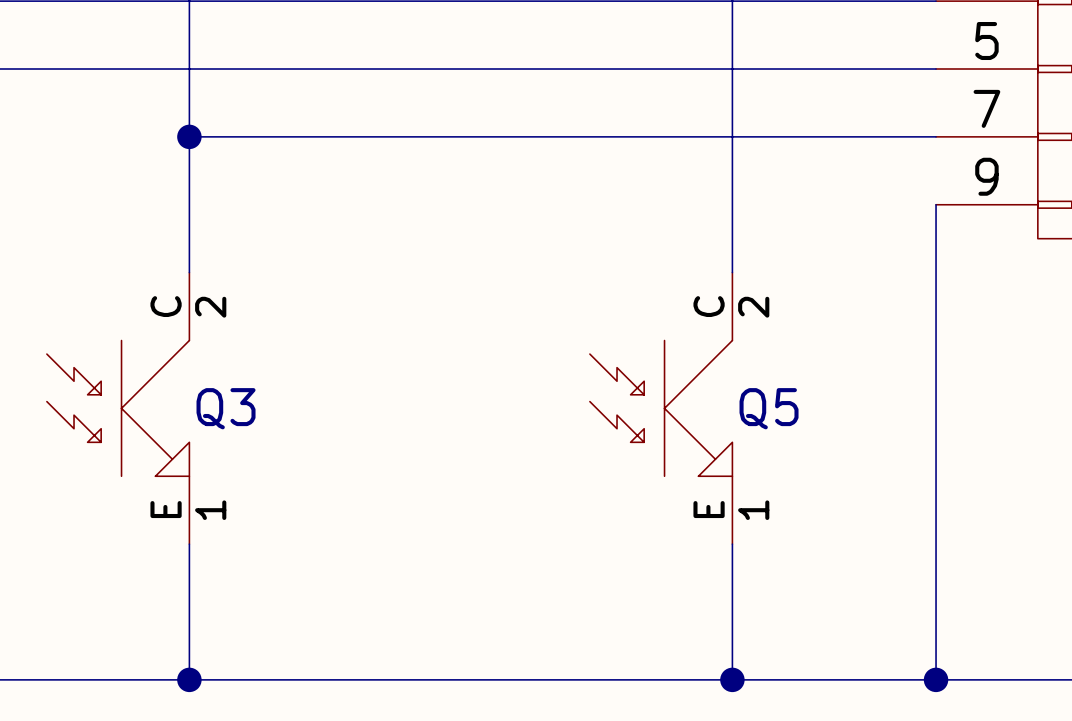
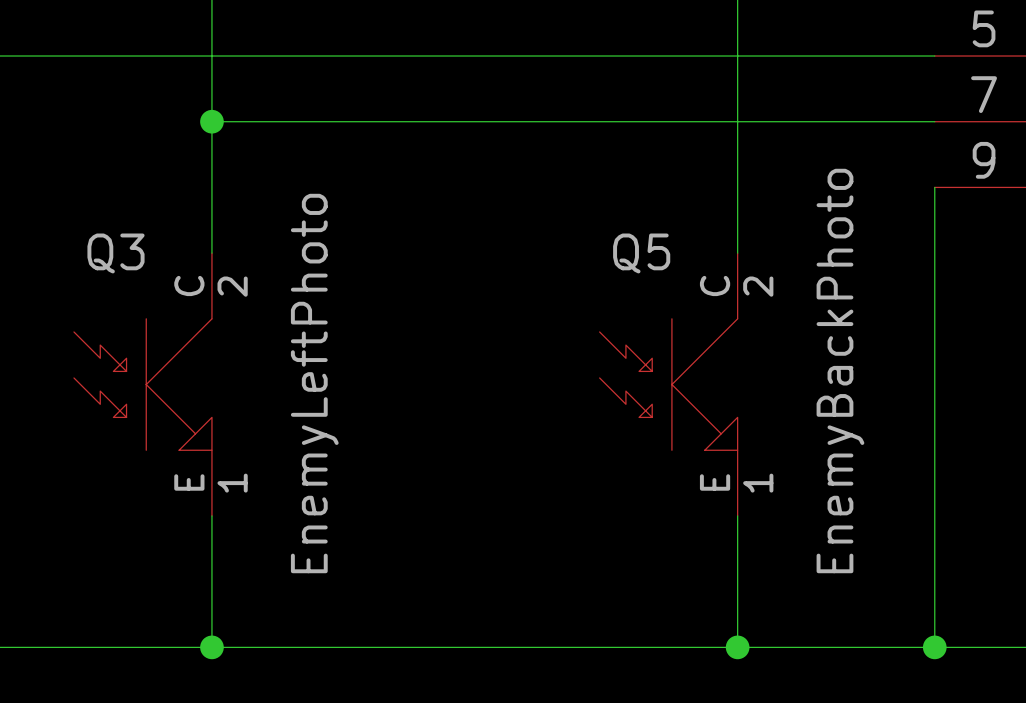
Q5 value: none -> EnemyBackPhoto (840, 371)
Q3 value: none -> EnemyLeftPhoto (314, 383)
Q3 name position: Q3 (226, 408) -> Q3 (116, 253)
Q5 name position: Q5 (769, 408) -> Q5 (641, 253)

